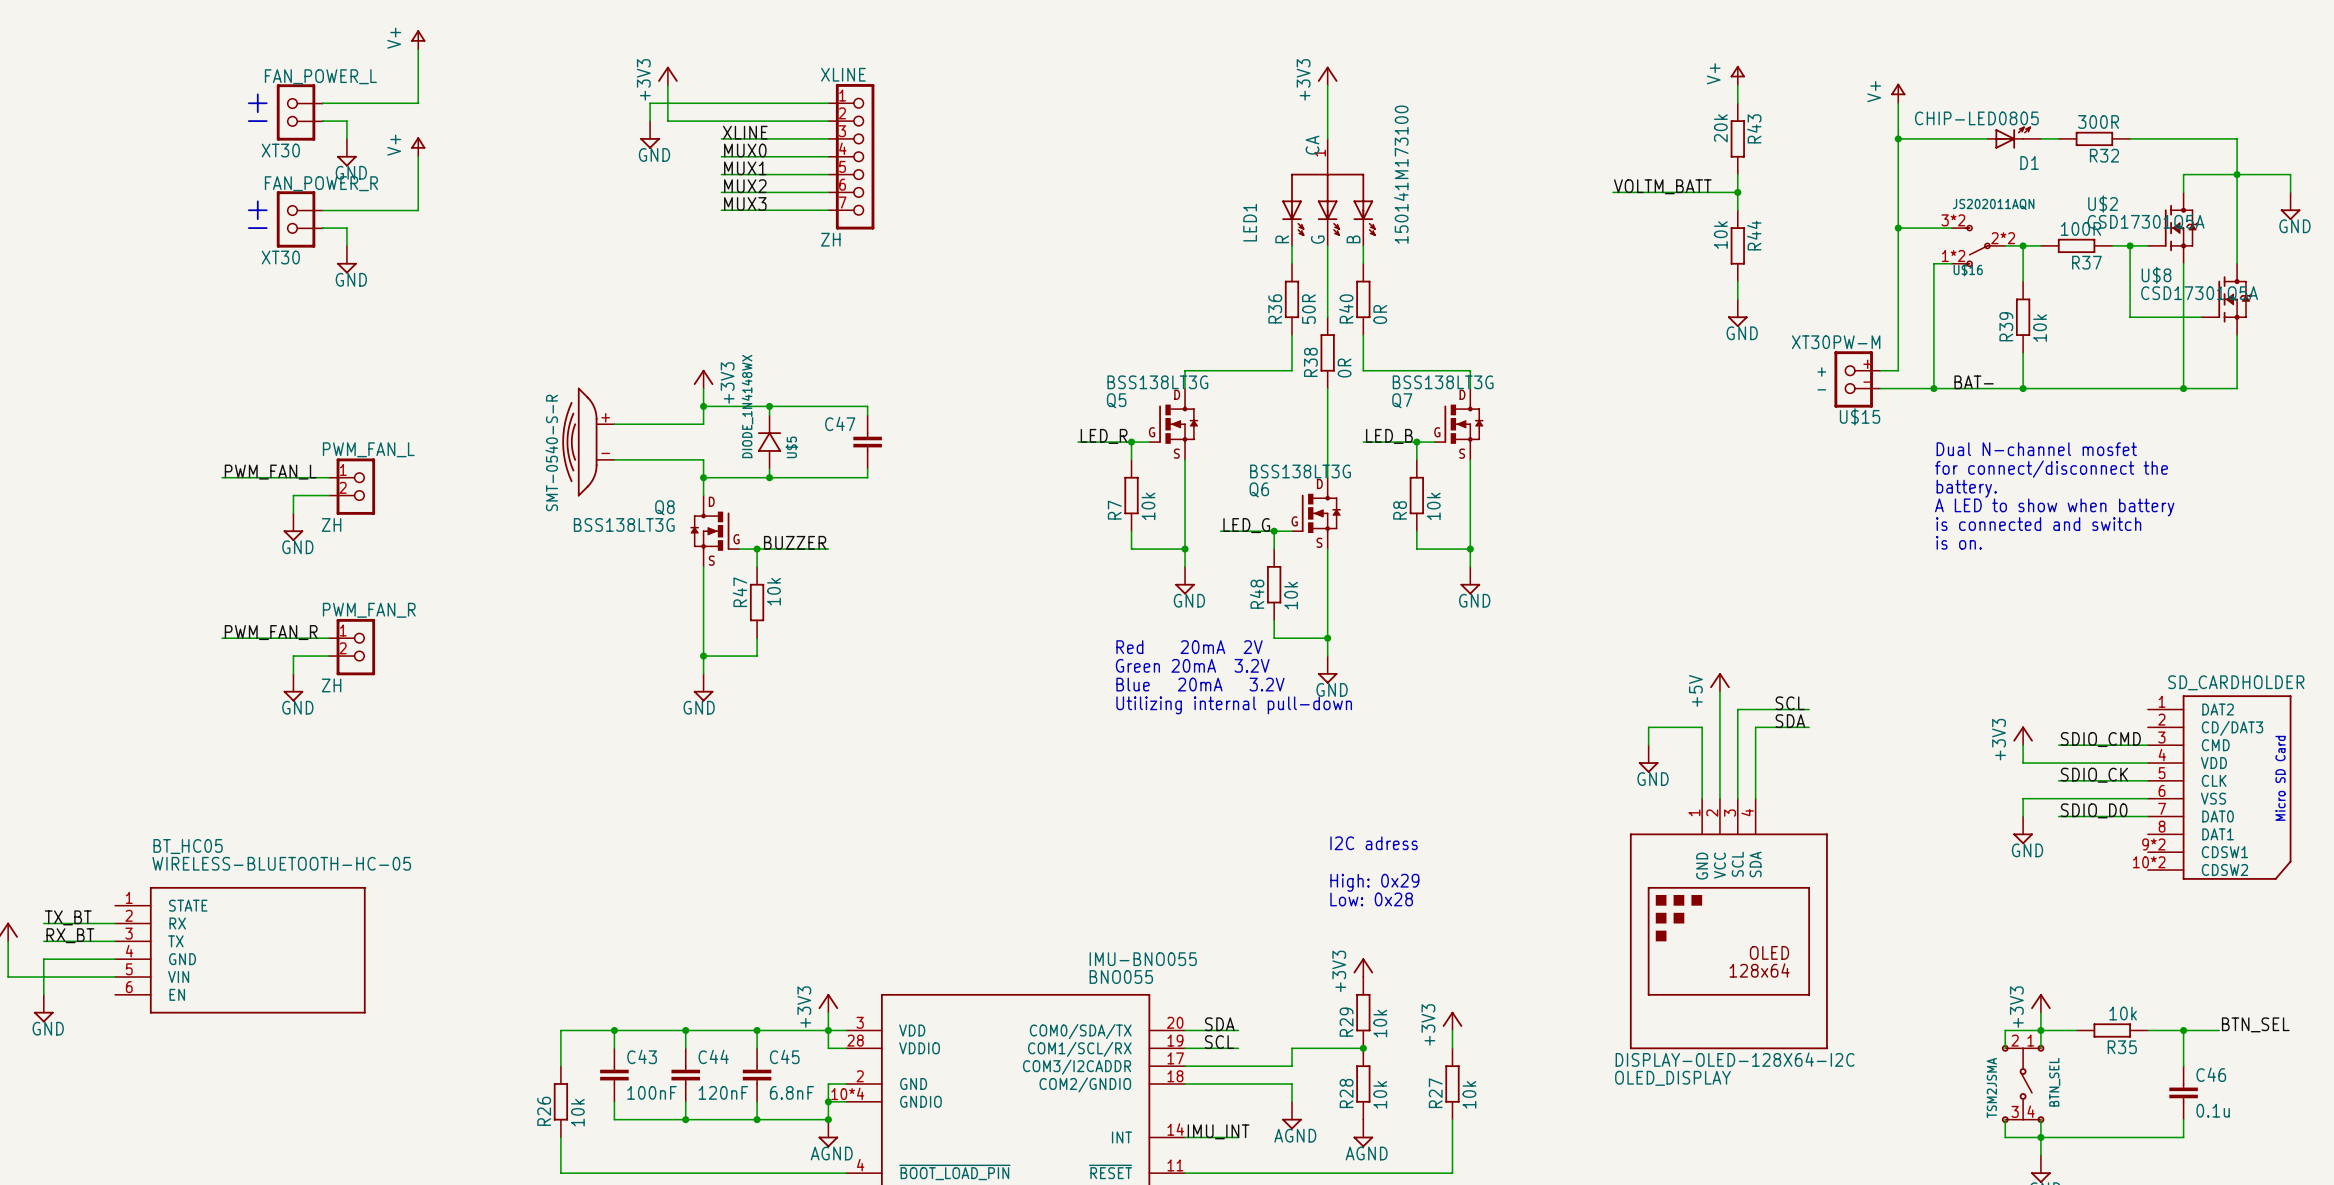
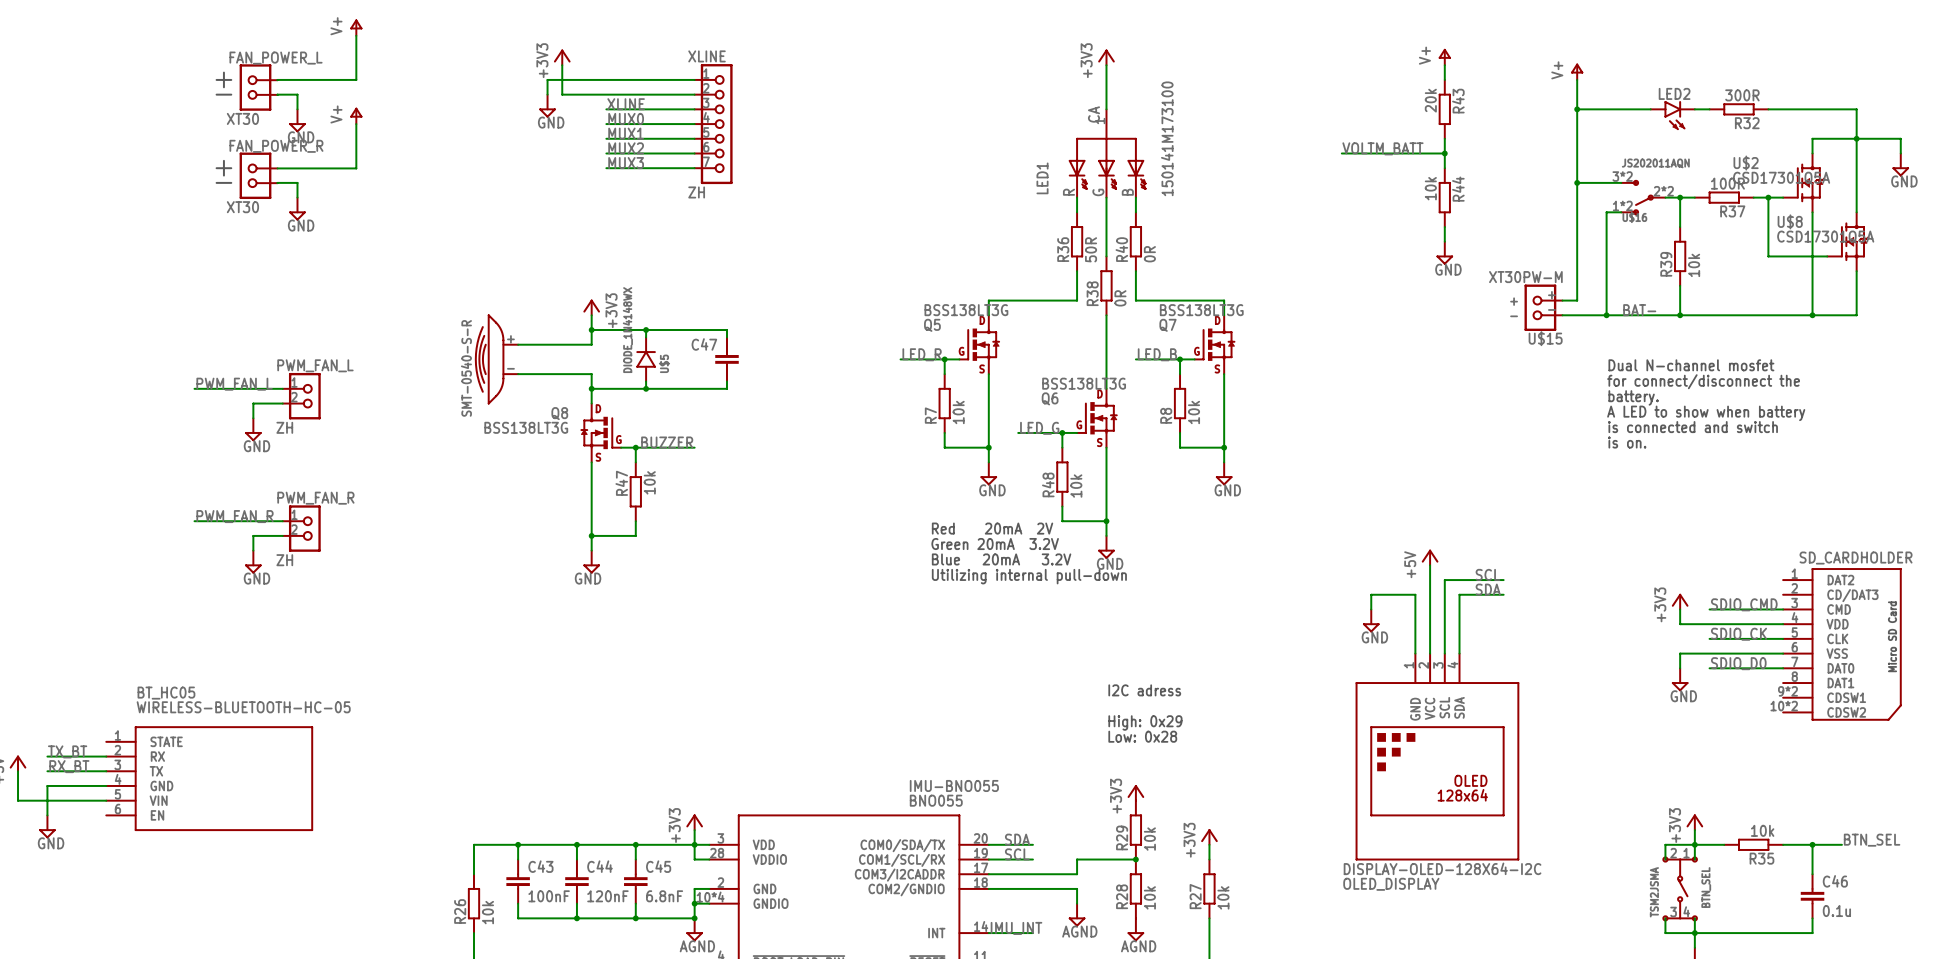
D1: CHIP-LED0805 (2014, 137) -> none
LED2: none -> (1672, 115)

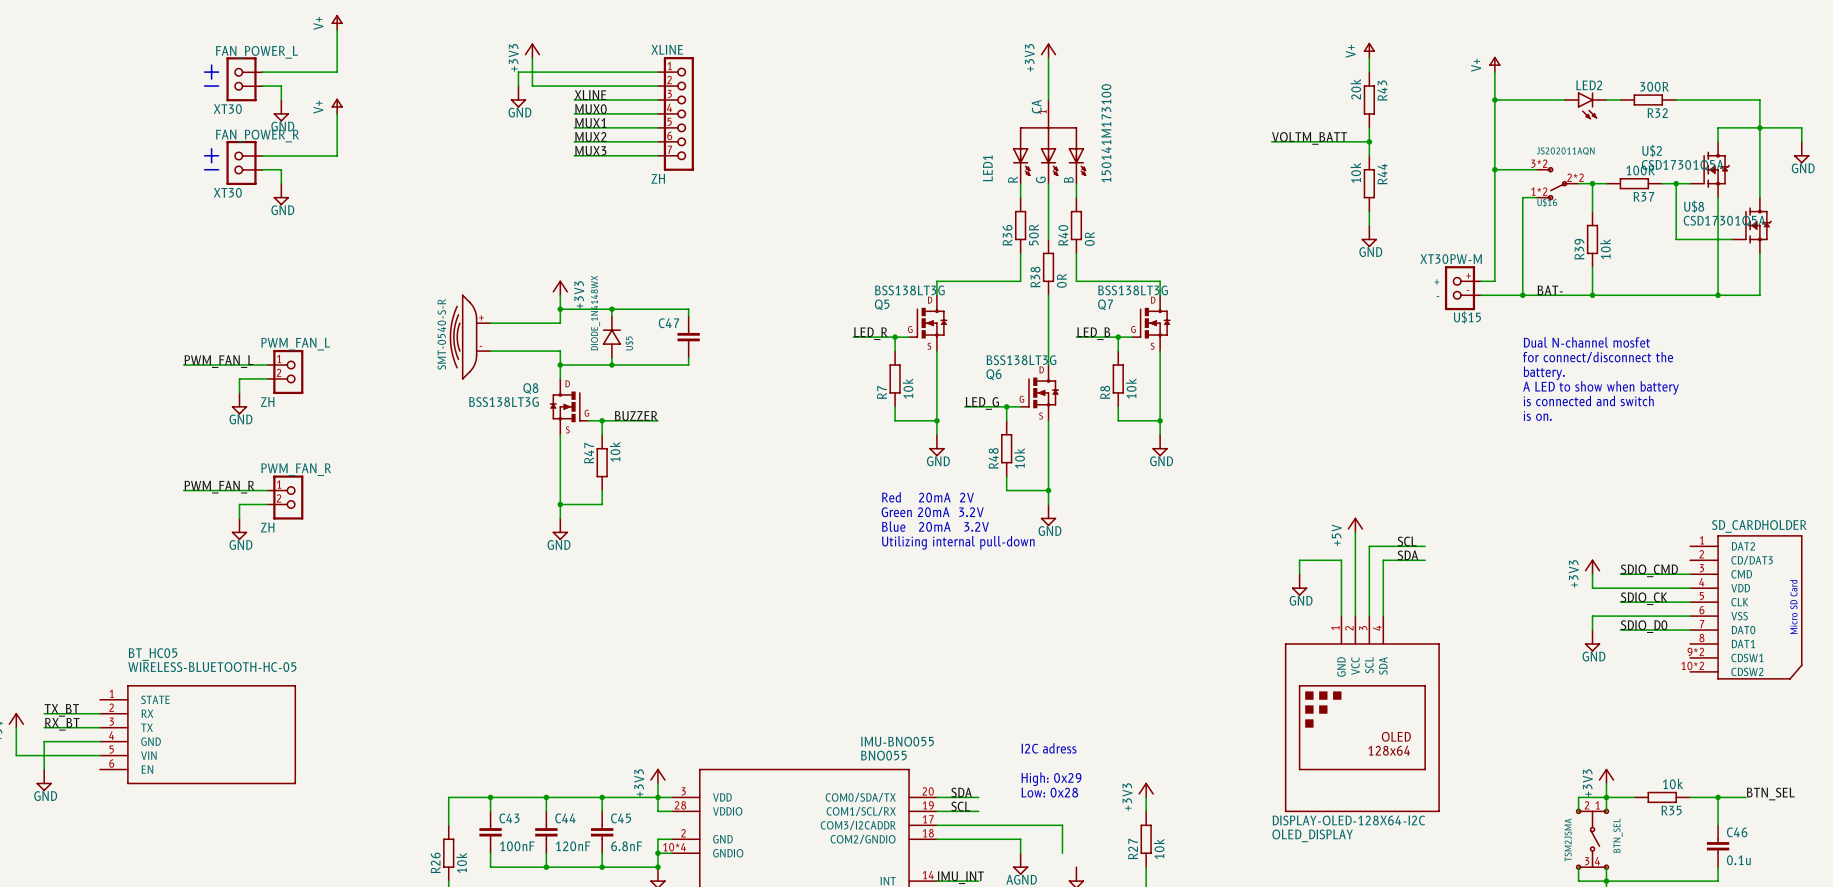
text position: I2C adress (1144, 690) -> I2C adress (1048, 748)
text position: High: 0x29 (1145, 722) -> High: 0x29 (1051, 779)
text position: Low: 0x28 (1142, 736) -> Low: 0x28 (1049, 792)
power symbol: +3V3 (1135, 792) -> none
R29: 10k (1135, 830) -> none
wire: (1135, 859) (1077, 859) (1077, 874) -> (1062, 853) (1062, 825) (1020, 825)
junction: (1135, 859) -> none
R28: 10k (1135, 888) -> none

